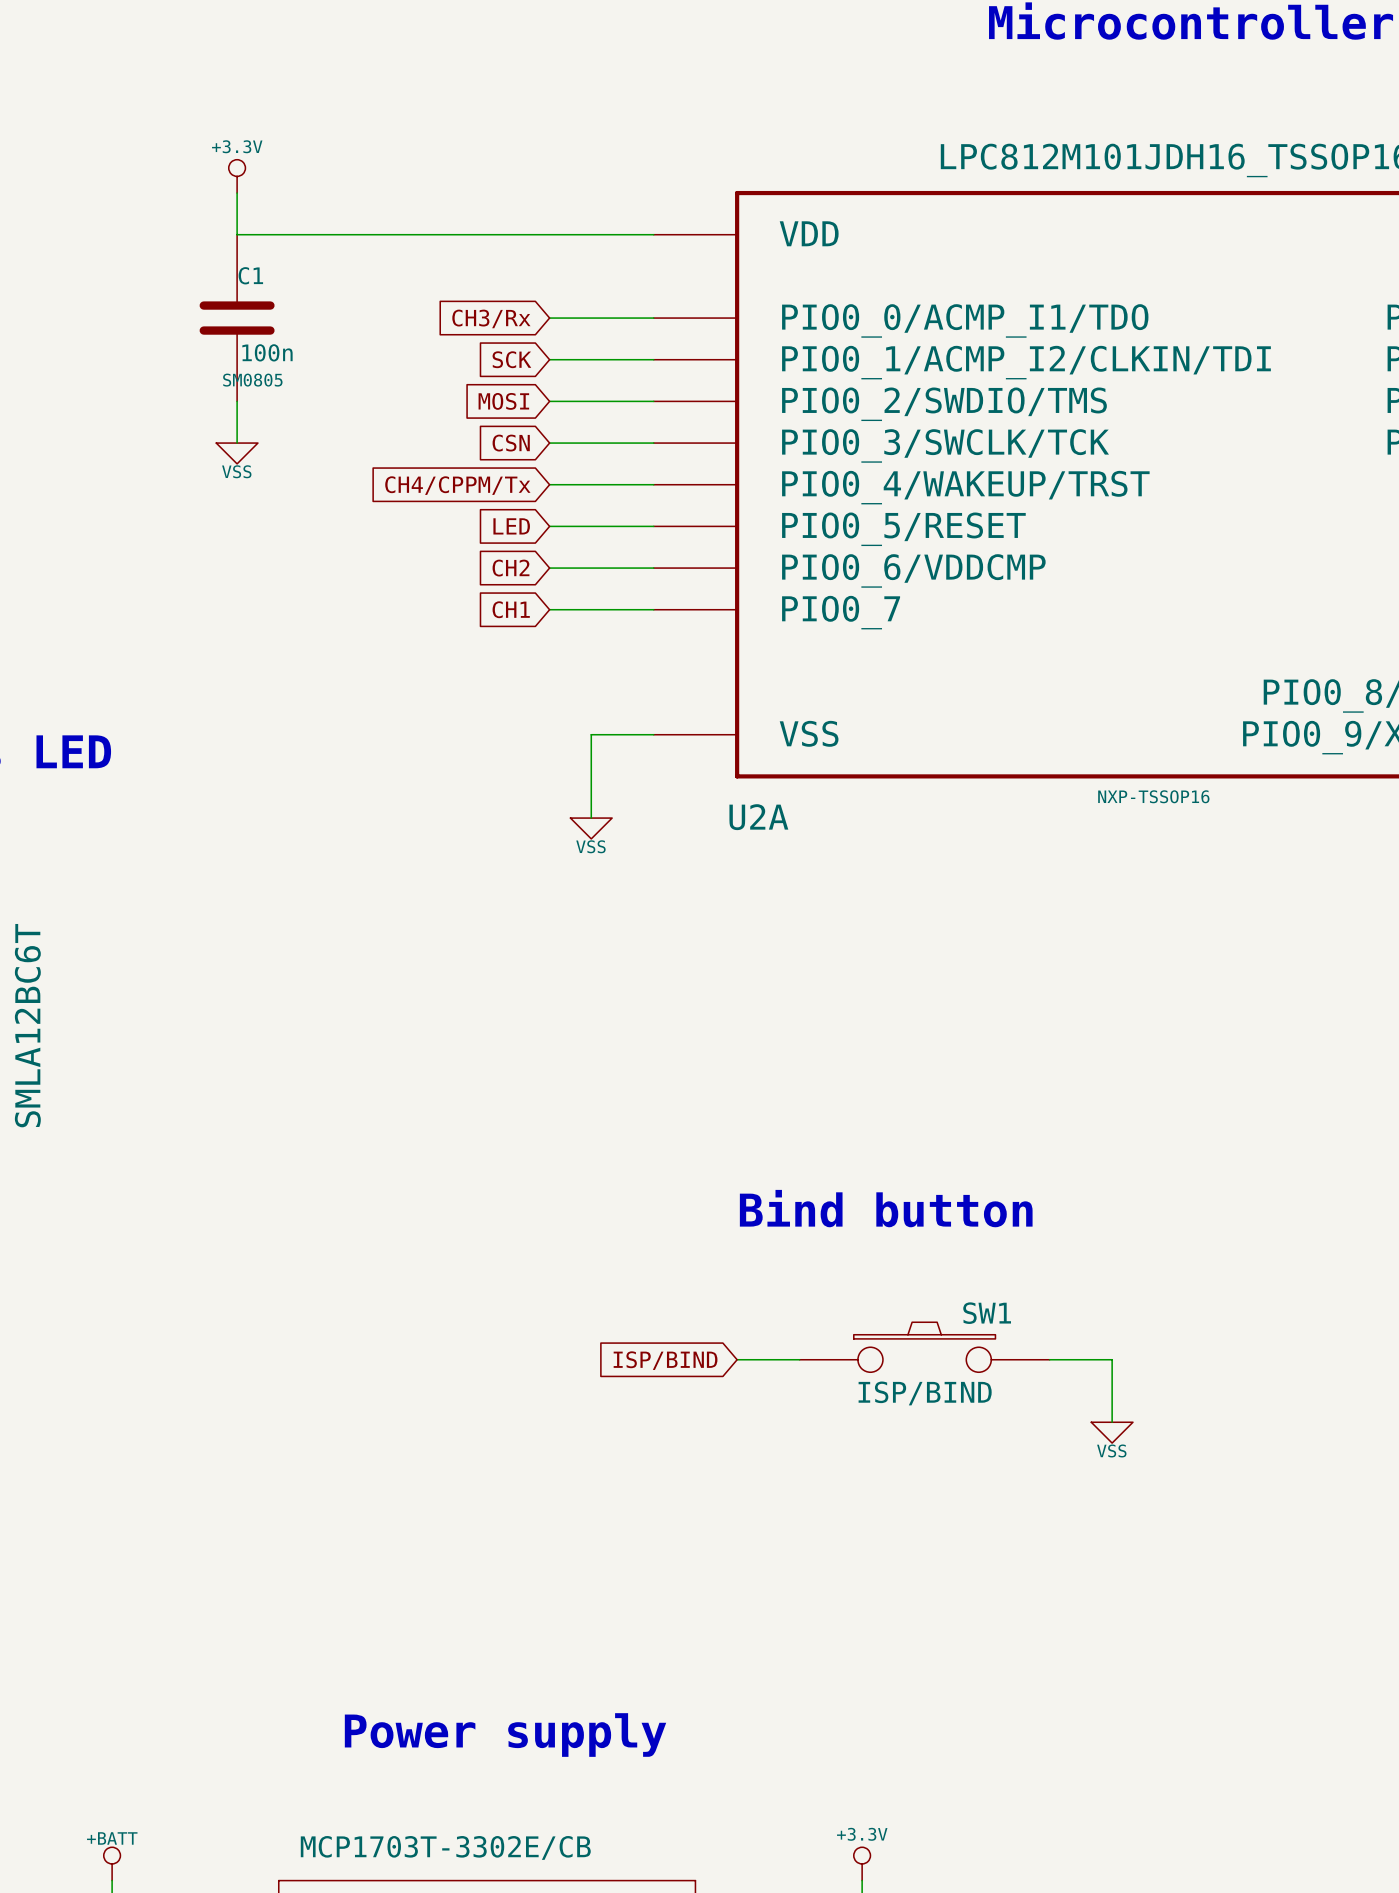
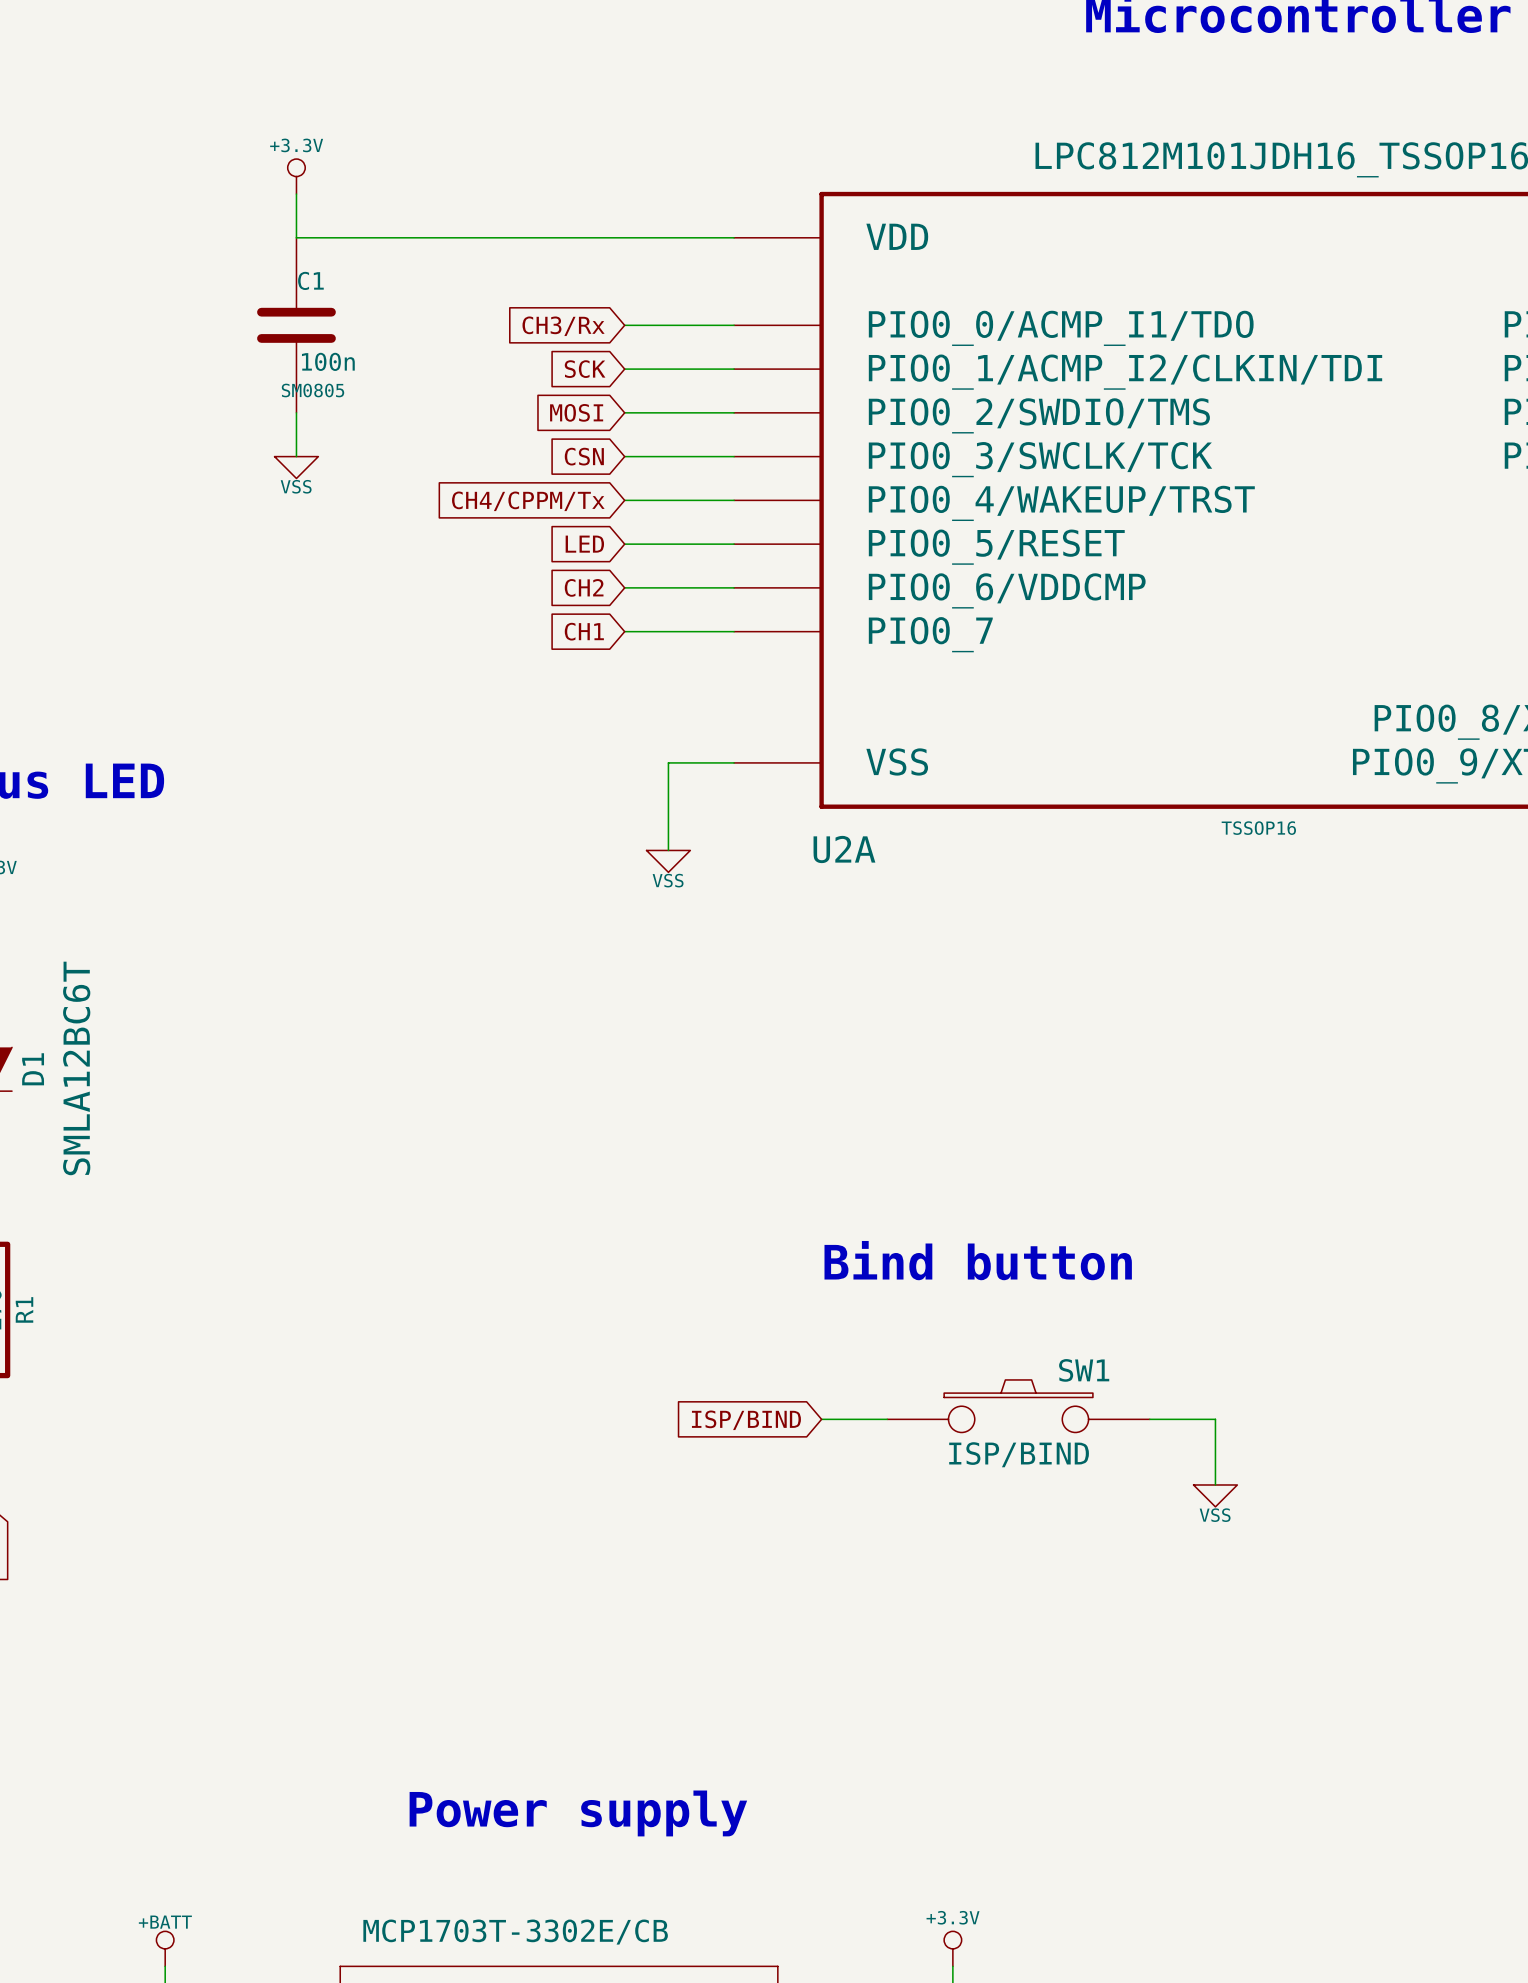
U2A text: NXP-TSSOP16 (1153, 796) -> TSSOP16 (1258, 828)

